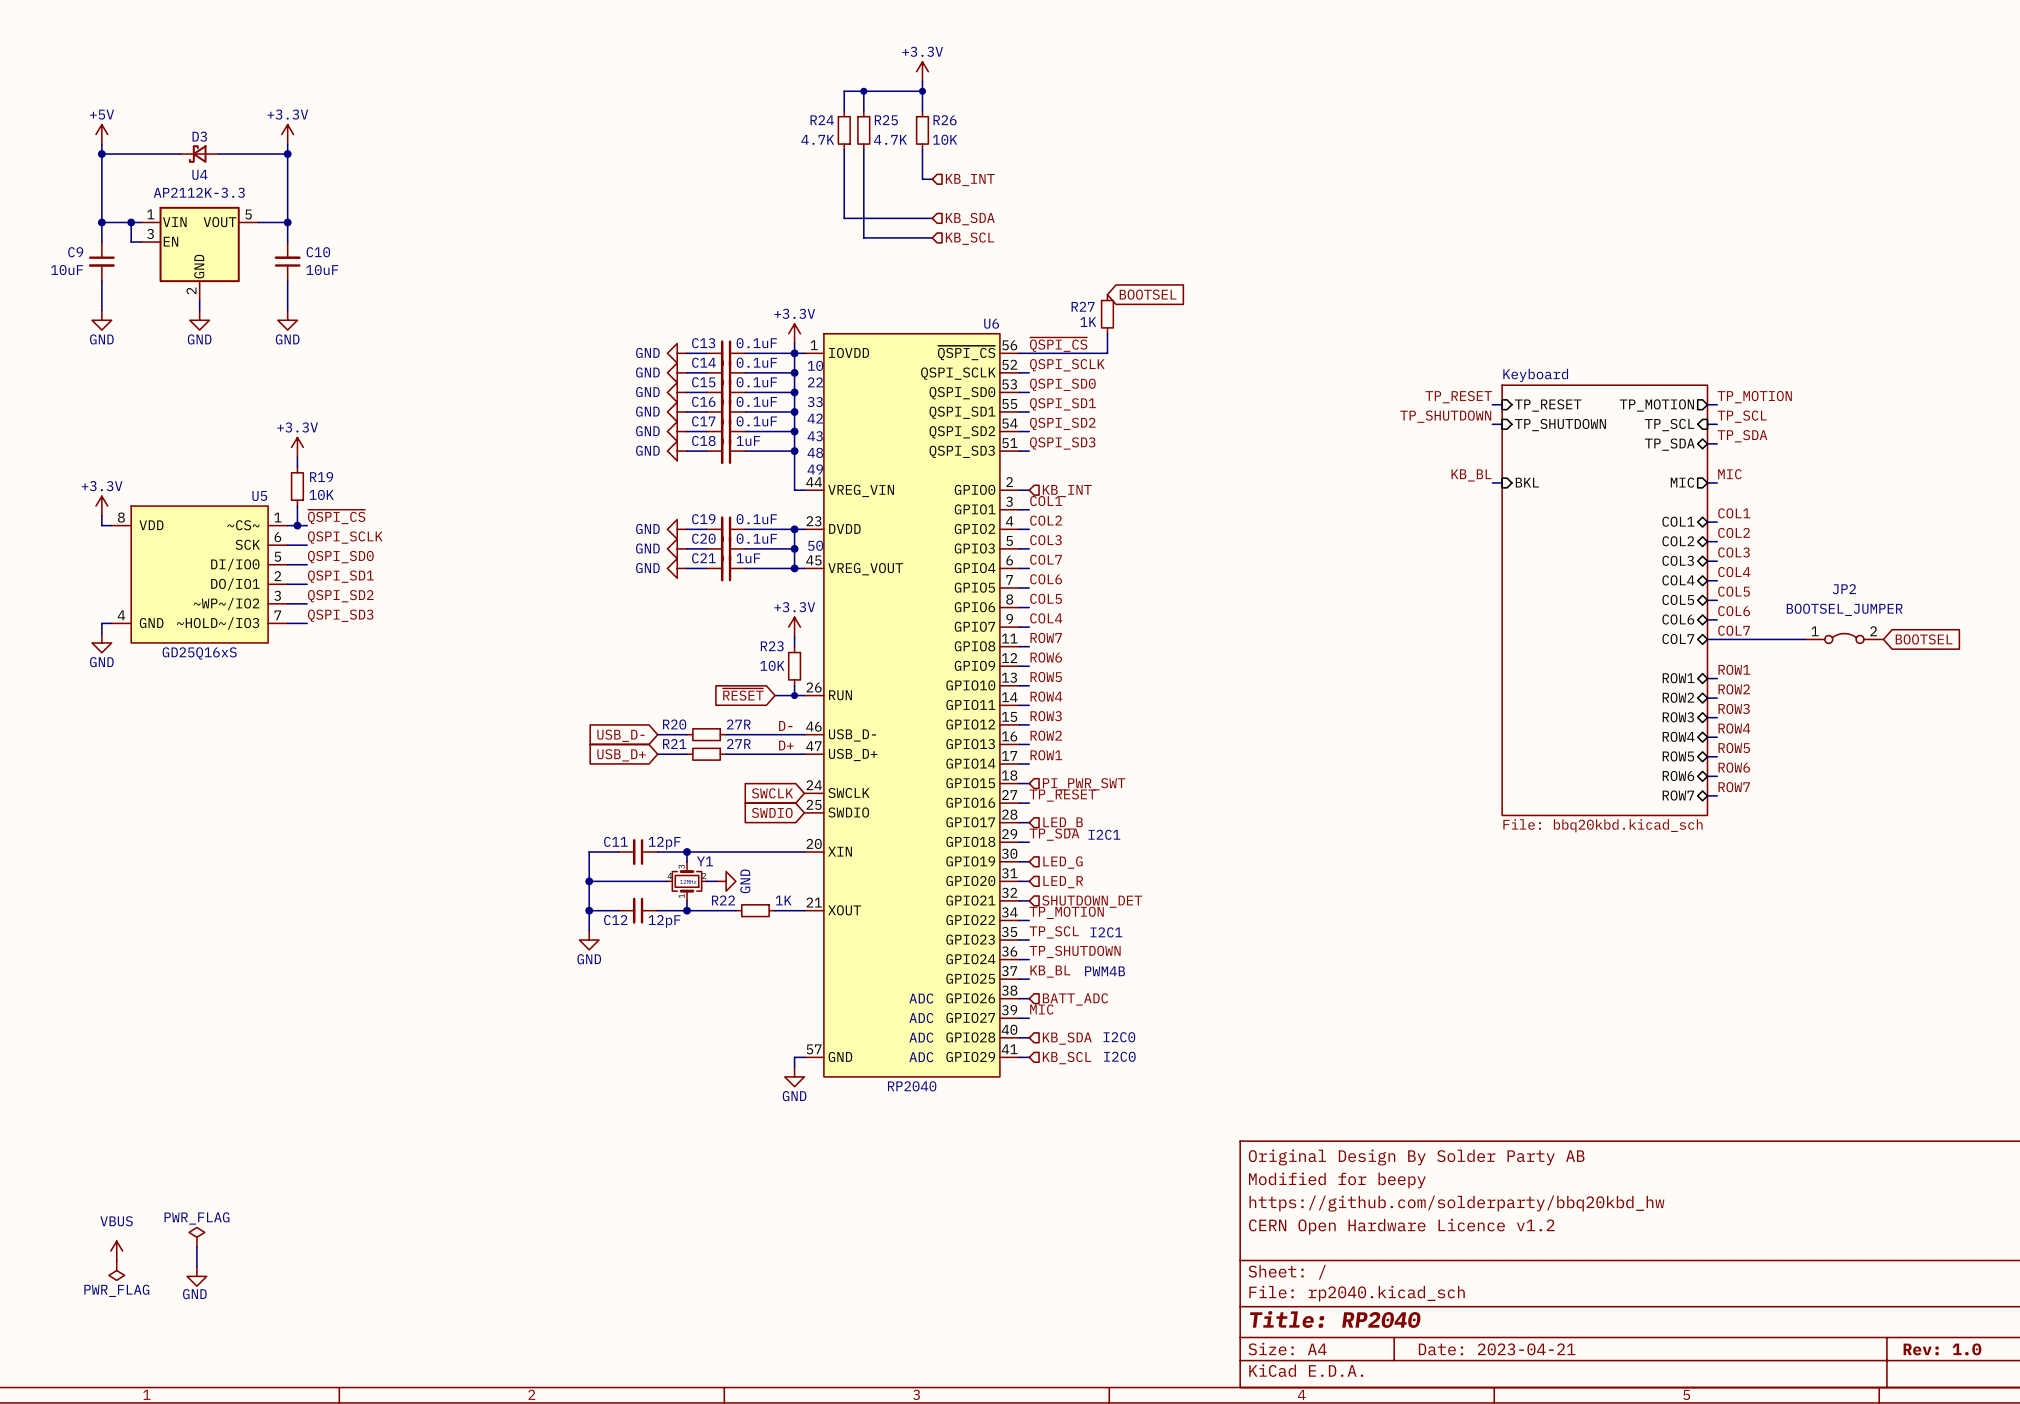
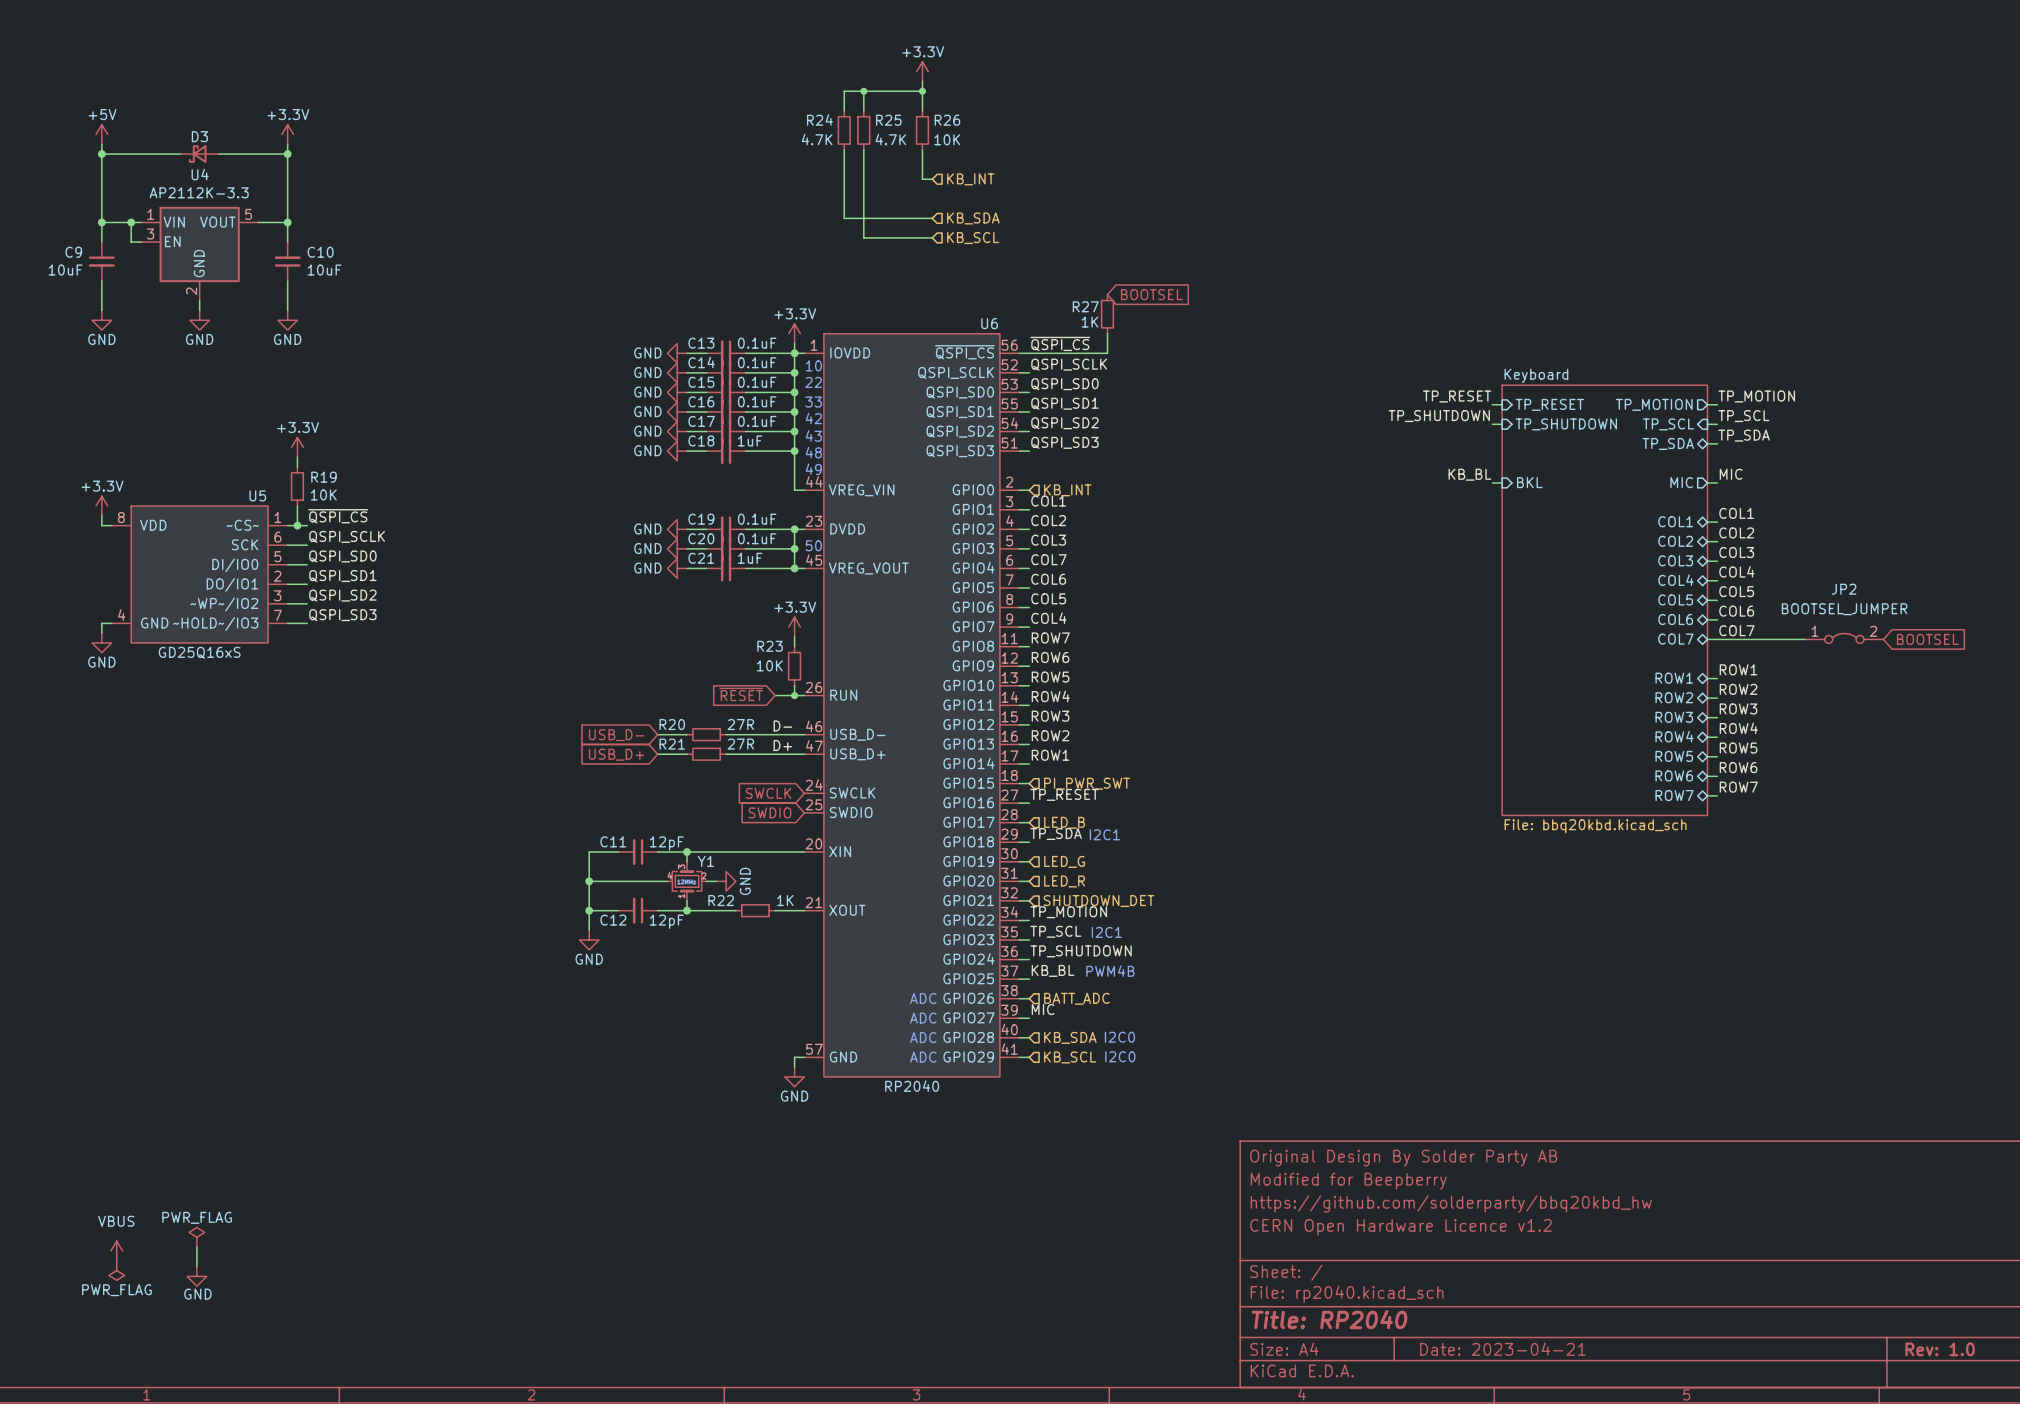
title block: Modified for beepy (1337, 1180) -> Modified for Beepberry (1348, 1181)

